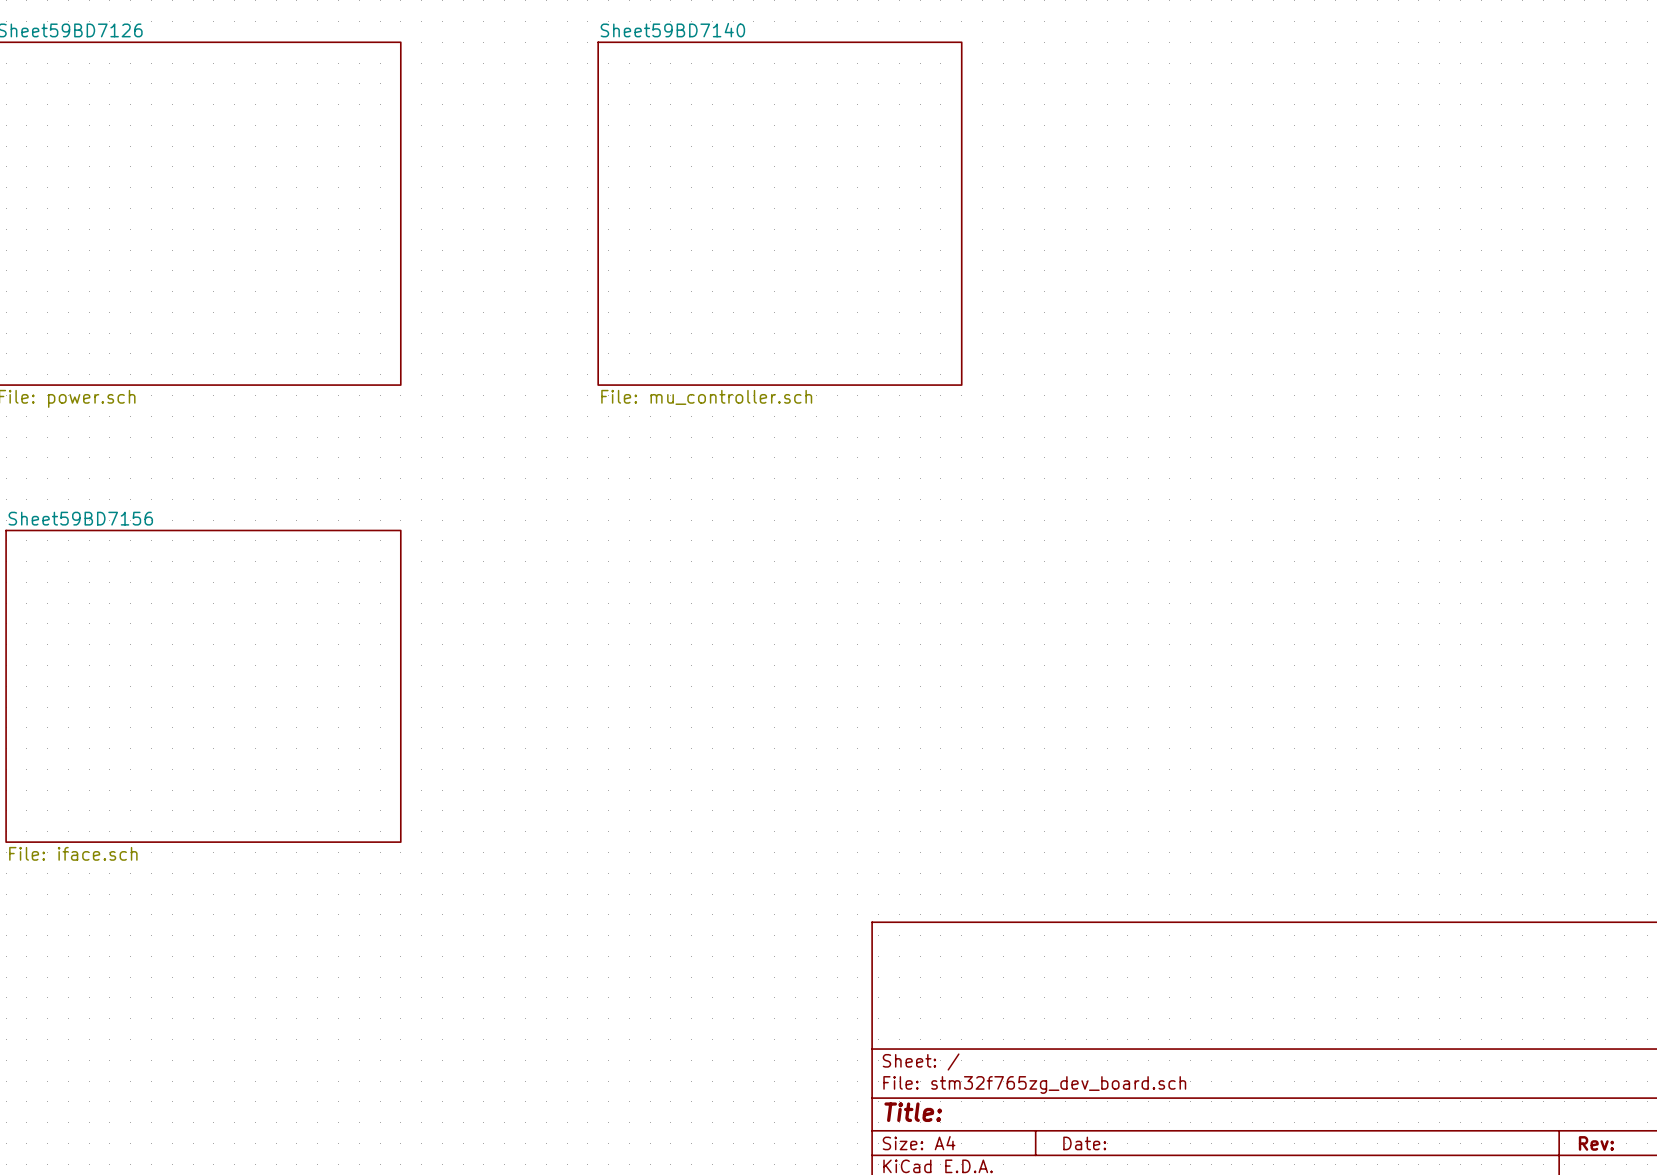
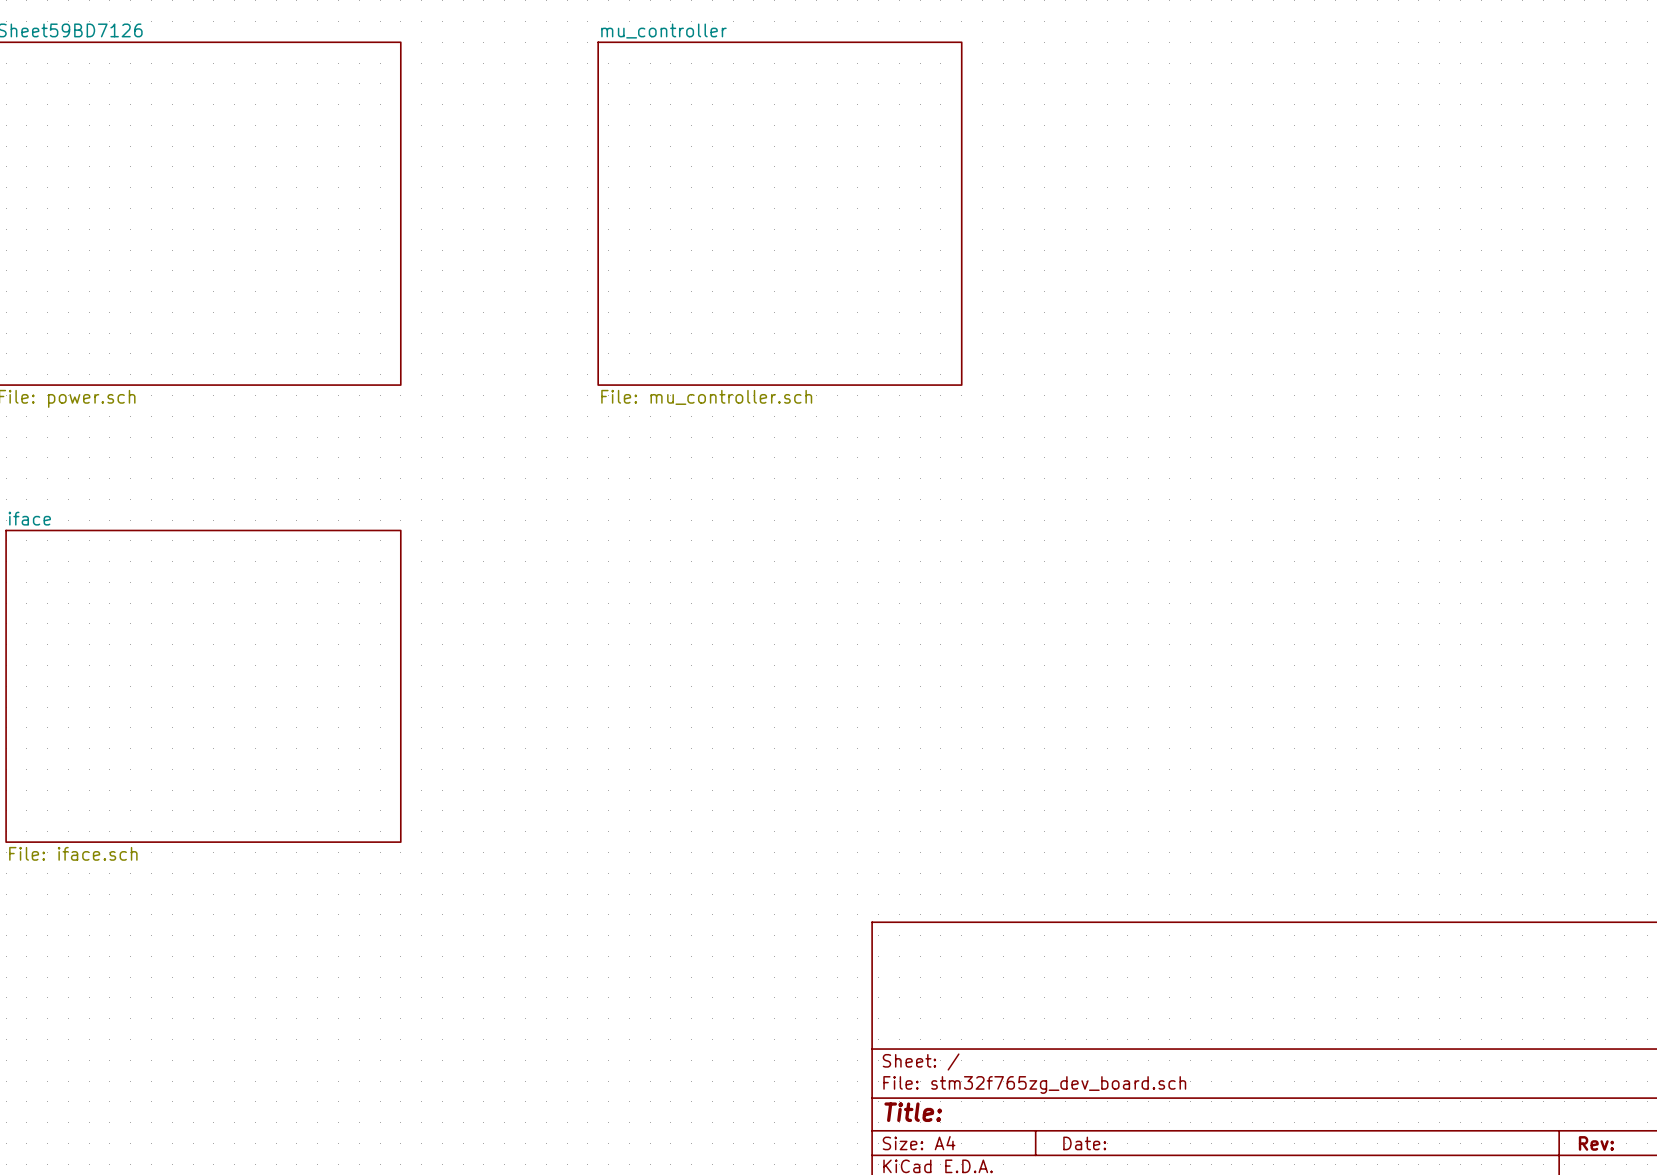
sheet Sheet59BD7140 name: Sheet59BD7140 (672, 30) -> mu_controller (663, 31)
sheet Sheet59BD7156 name: Sheet59BD7156 (80, 518) -> iface (29, 518)

